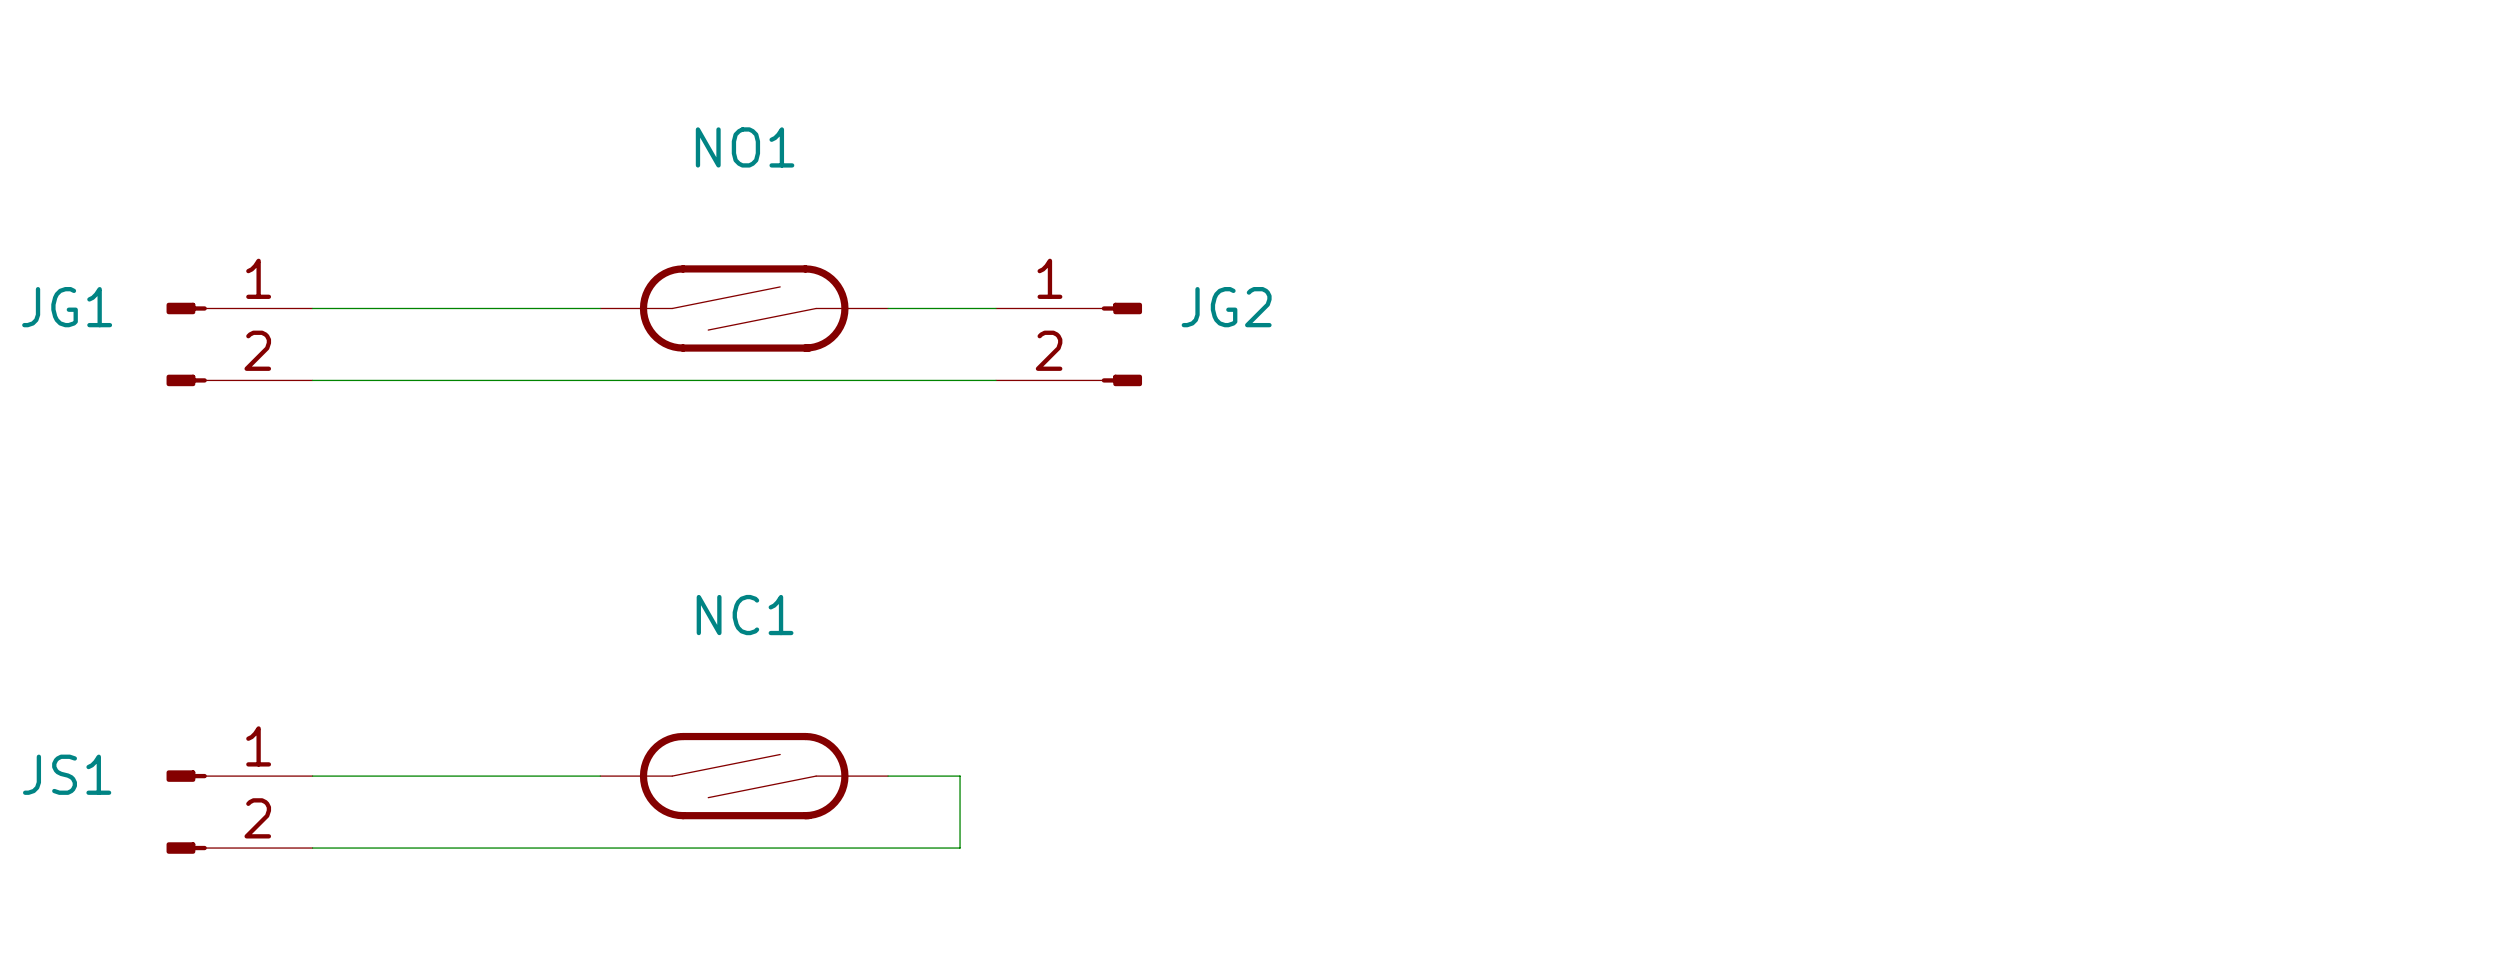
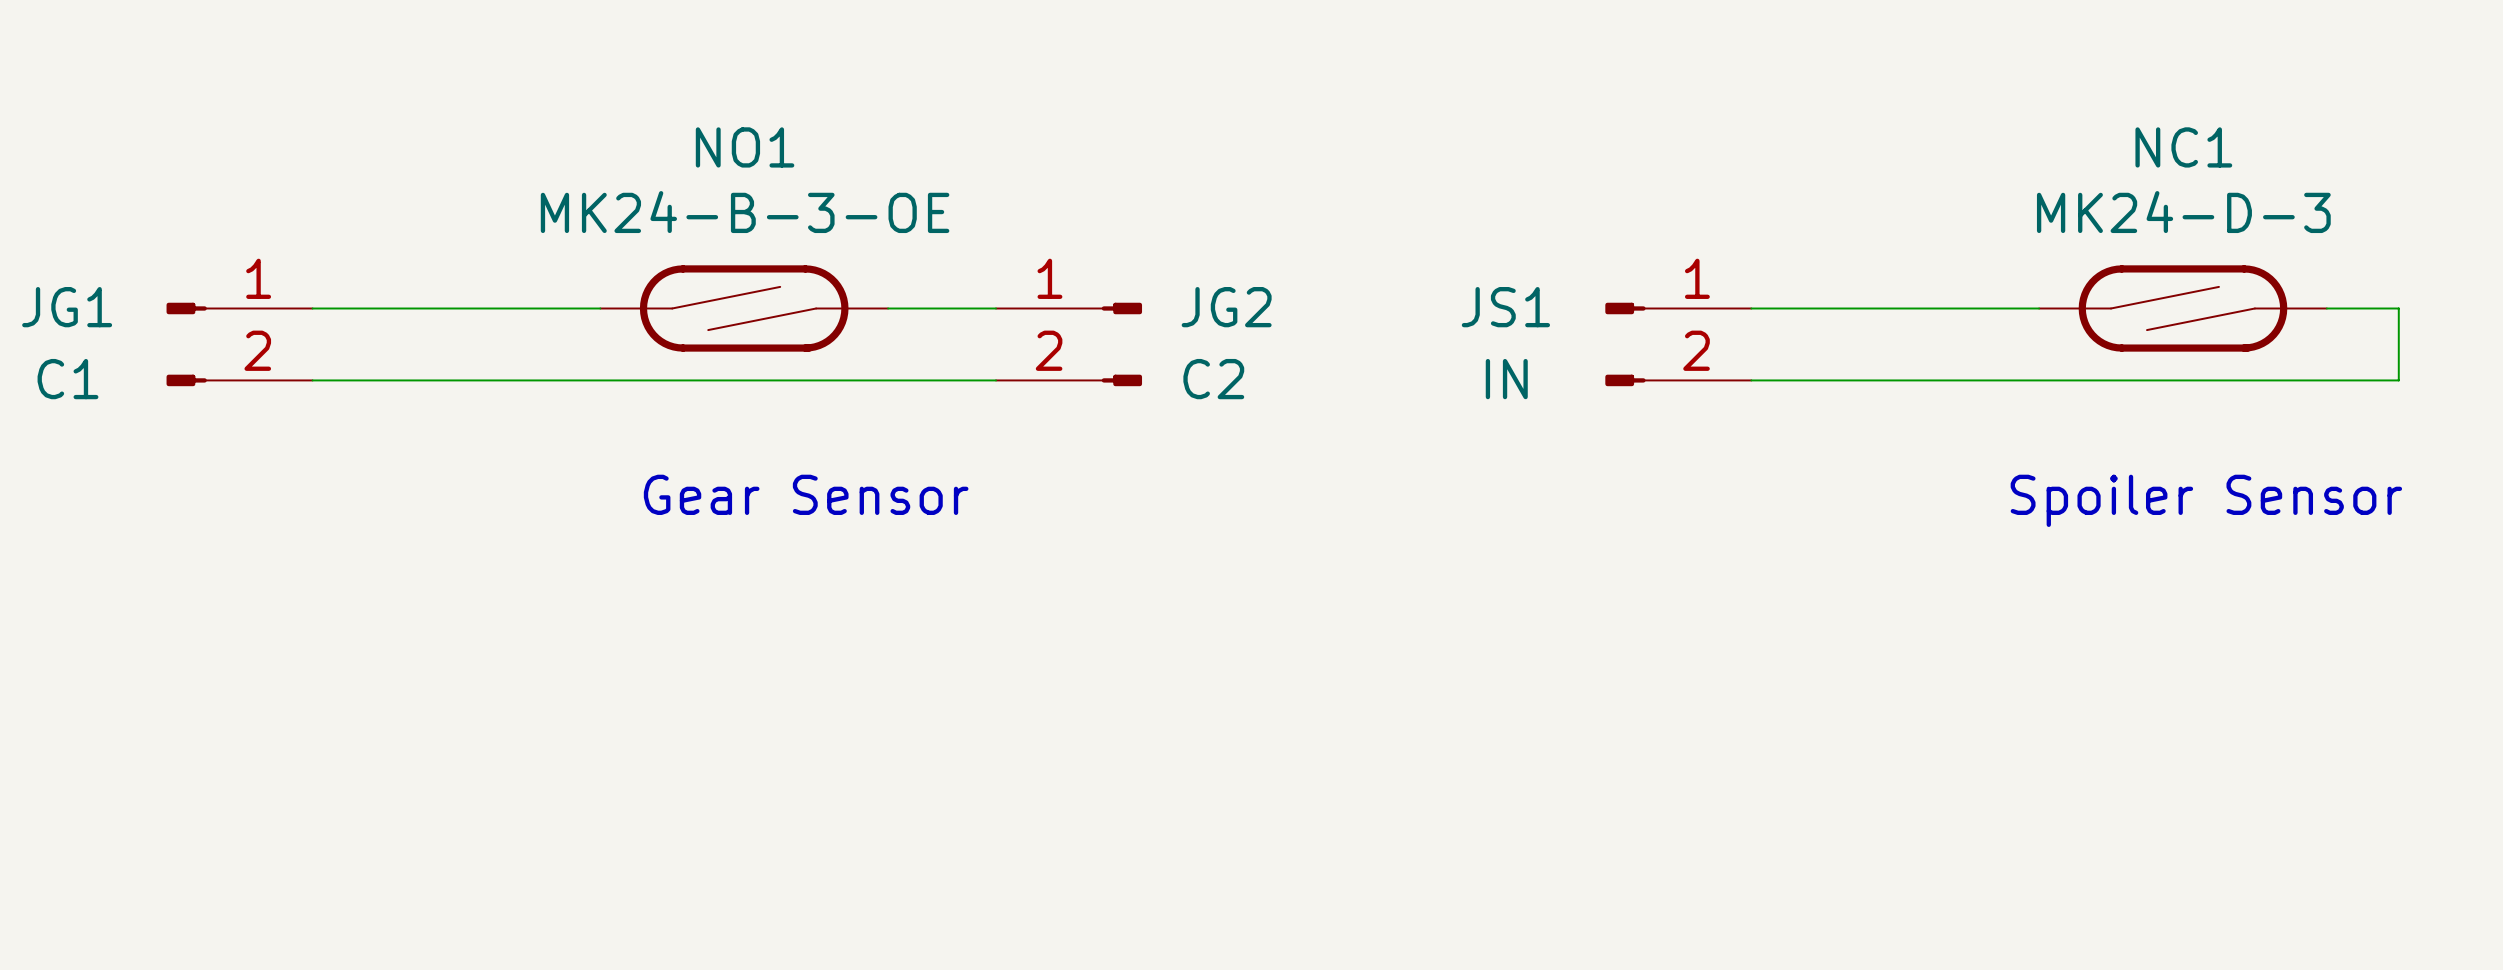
NO1 value: none -> MK24-B-3-OE (745, 212)
NC1 value: none -> MK24-D-3 (2183, 212)
wire: none -> (1751, 308) (2039, 308)
wire: none -> (2326, 308) (2398, 308) (2398, 380) (1751, 380)
JG1 value: none -> C1 (67, 379)
JG2 value: none -> C2 (1213, 379)
JS1 value: none -> IN (1506, 379)
text: none -> Gear Sensor (806, 494)
text: none -> Spoiler Sensor (2206, 500)
wire: (312, 776) (600, 776) -> none
NC1 position: (744, 776) -> (2182, 308)
wire: (888, 776) (960, 776) (960, 848) (312, 848) -> none
JS1 position: (239, 812) -> (1678, 344)

